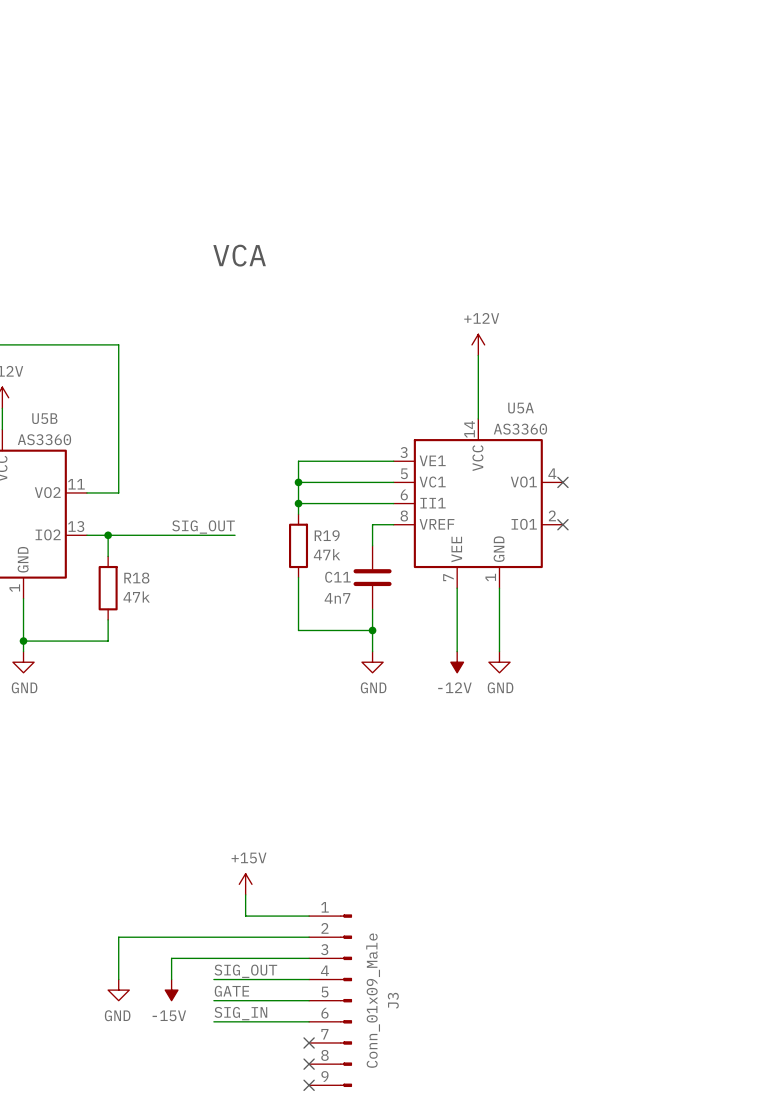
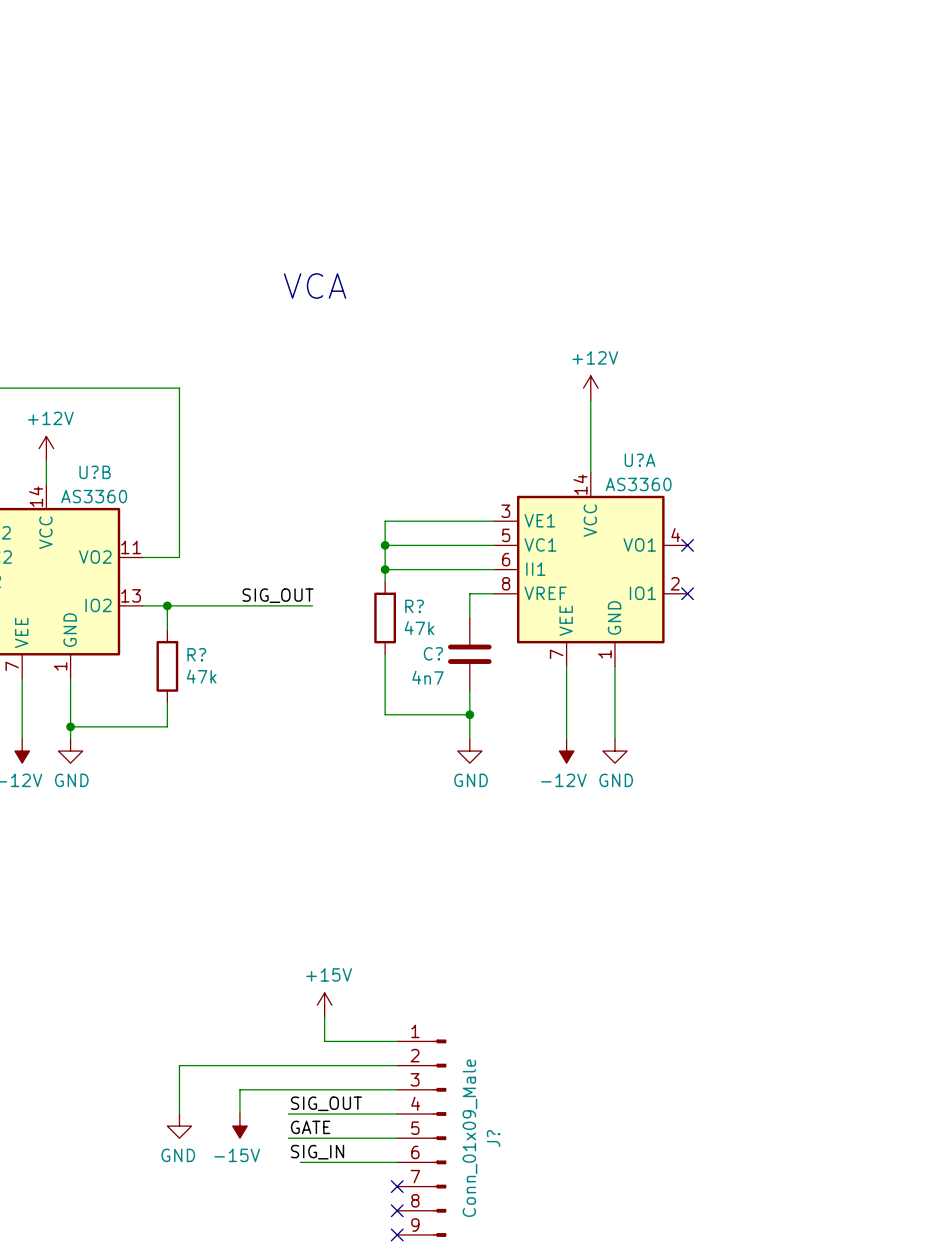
U5A name: U5A (521, 408) -> U?A (640, 460)
U5B name: U5B (44, 418) -> U?B (95, 472)
R19 name: R19 (327, 535) -> R? (414, 606)
C11 name: C11 (337, 577) -> C? (433, 653)
R18 name: R18 (136, 578) -> R? (196, 654)
J3 name: J3 (393, 1000) -> J? (493, 1138)
wire: (213, 1021) (224, 1021) -> none

